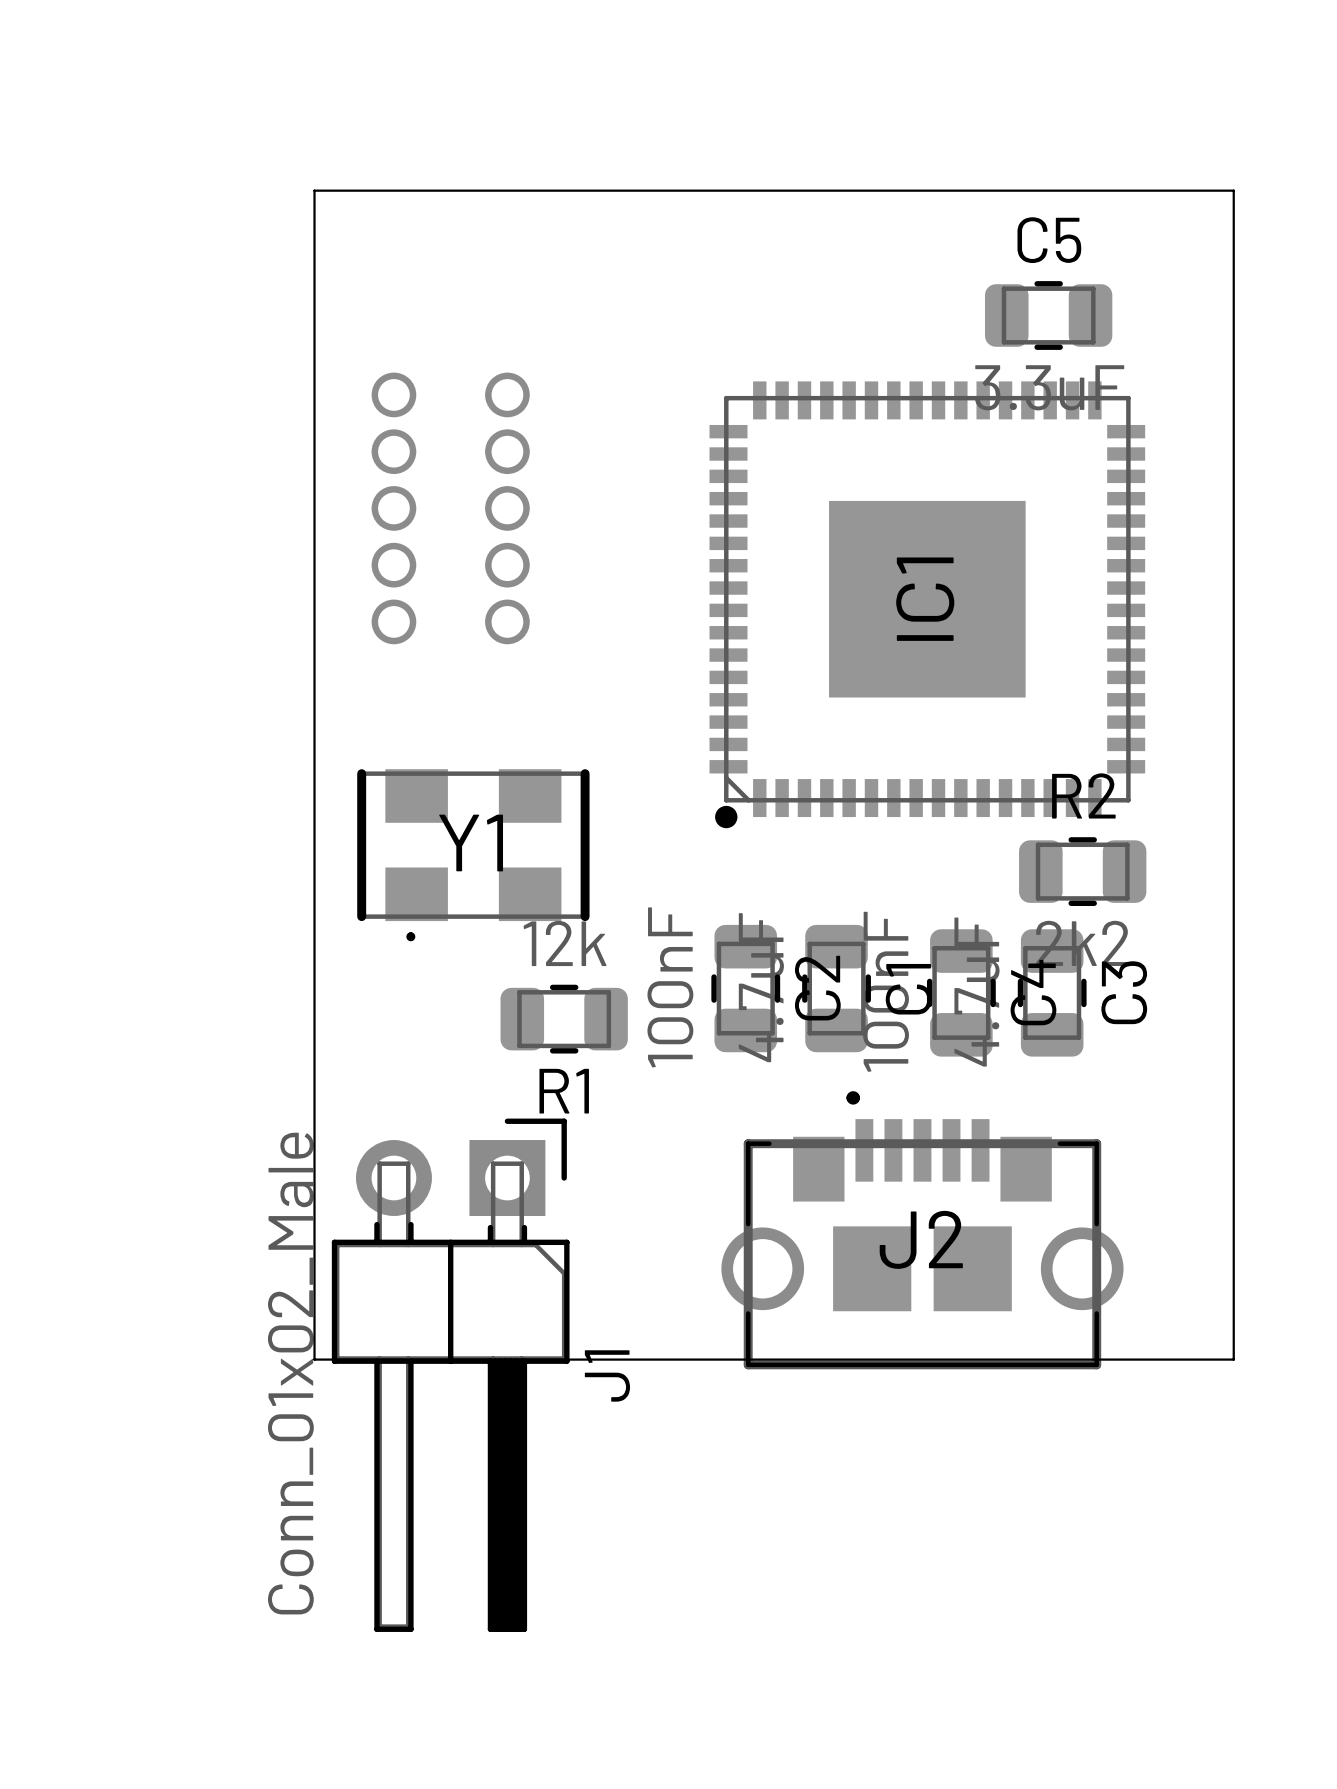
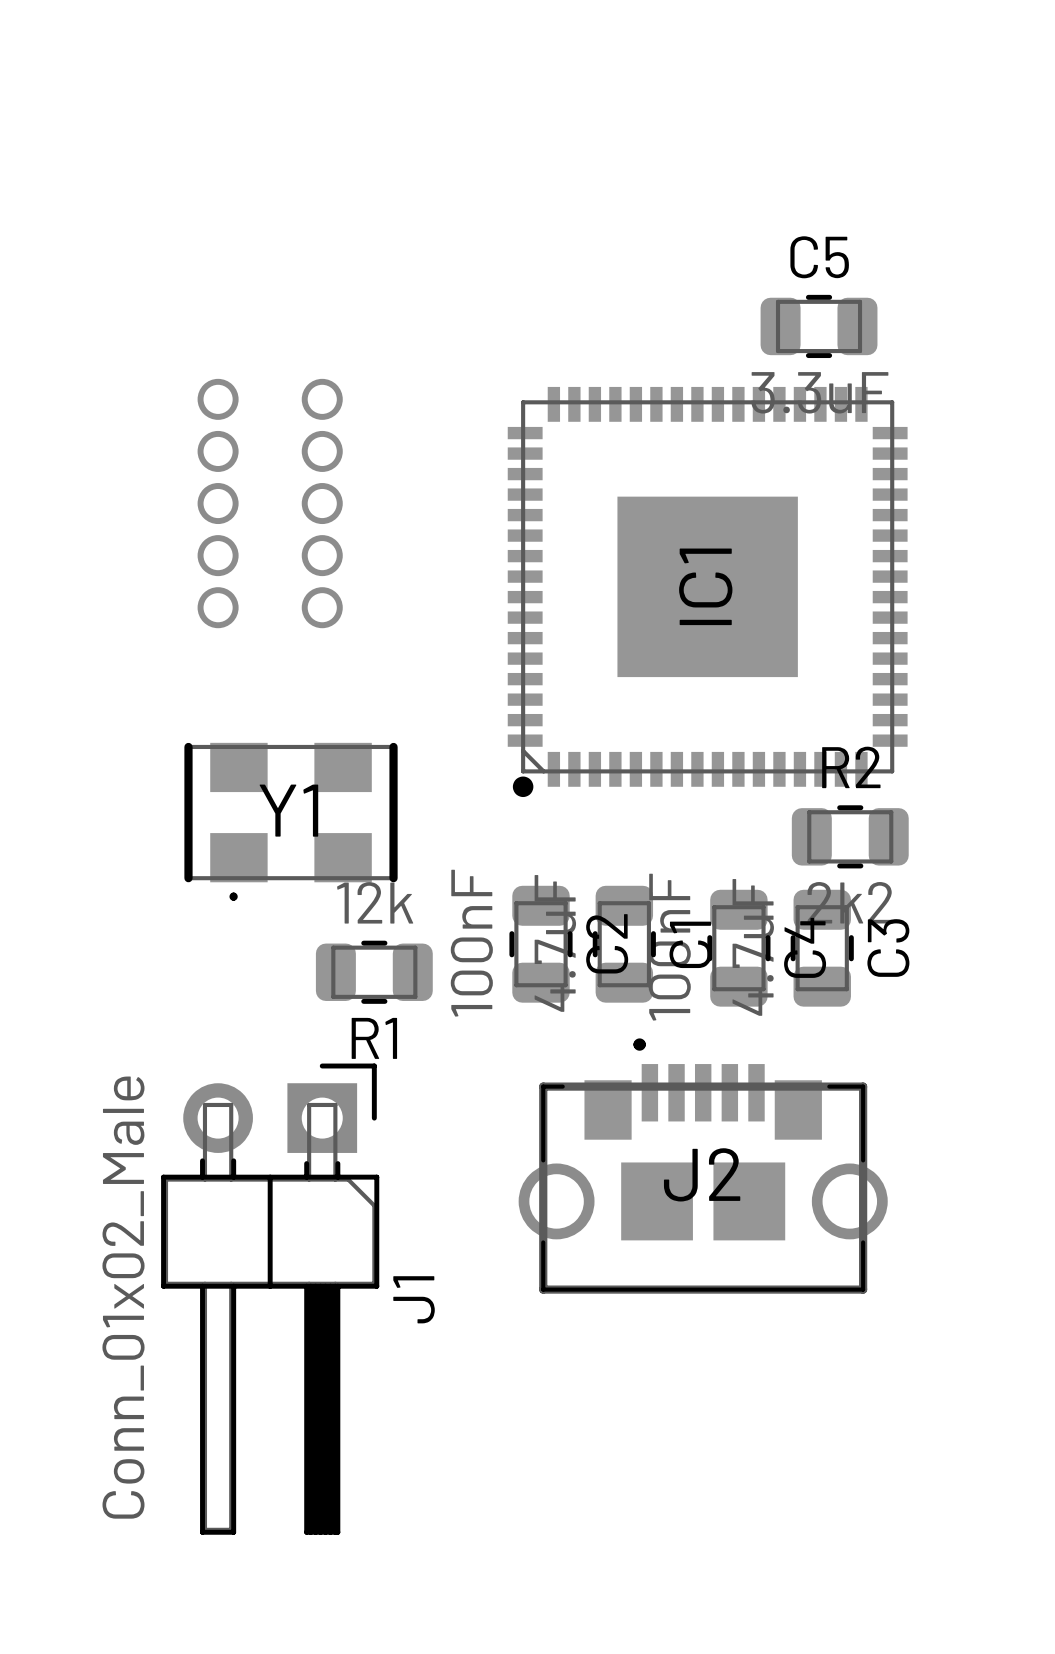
board edge: (314, 190) (314, 1359) (1233, 1359) (1233, 190) (314, 190) -> none

